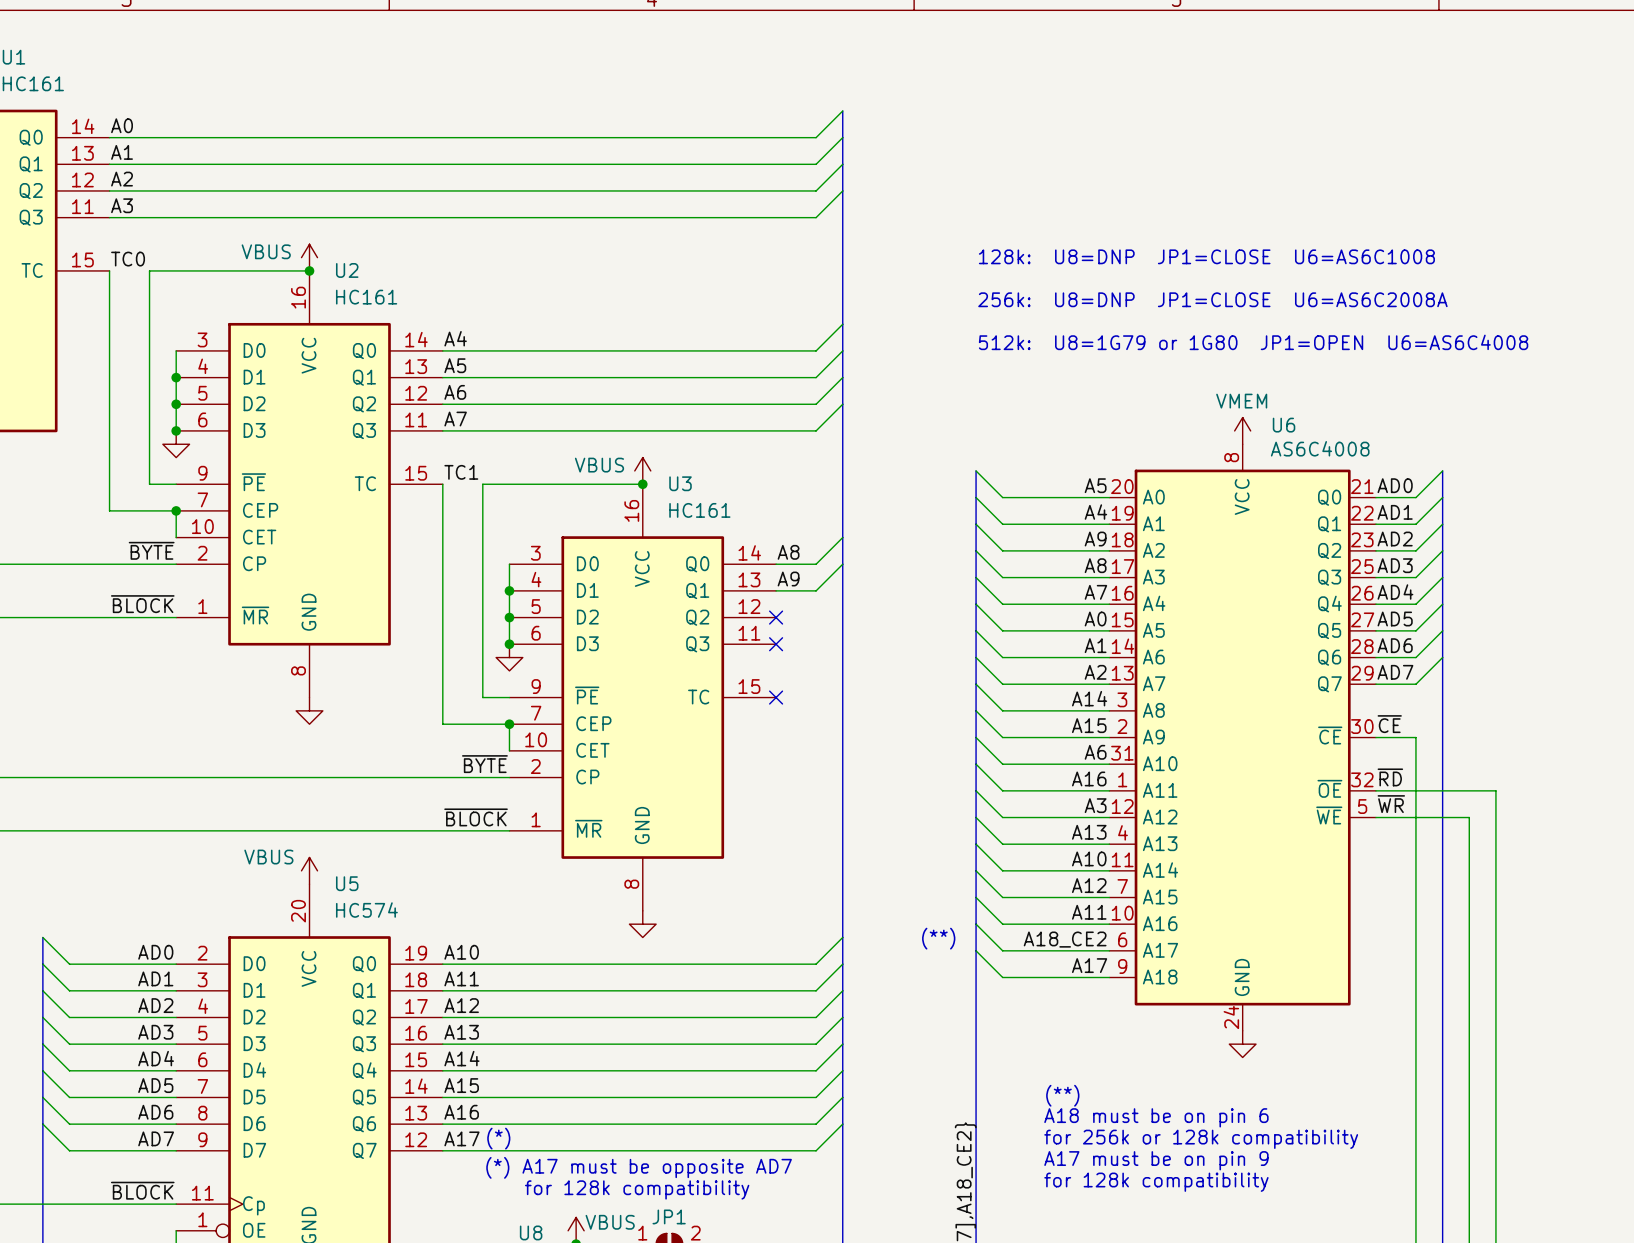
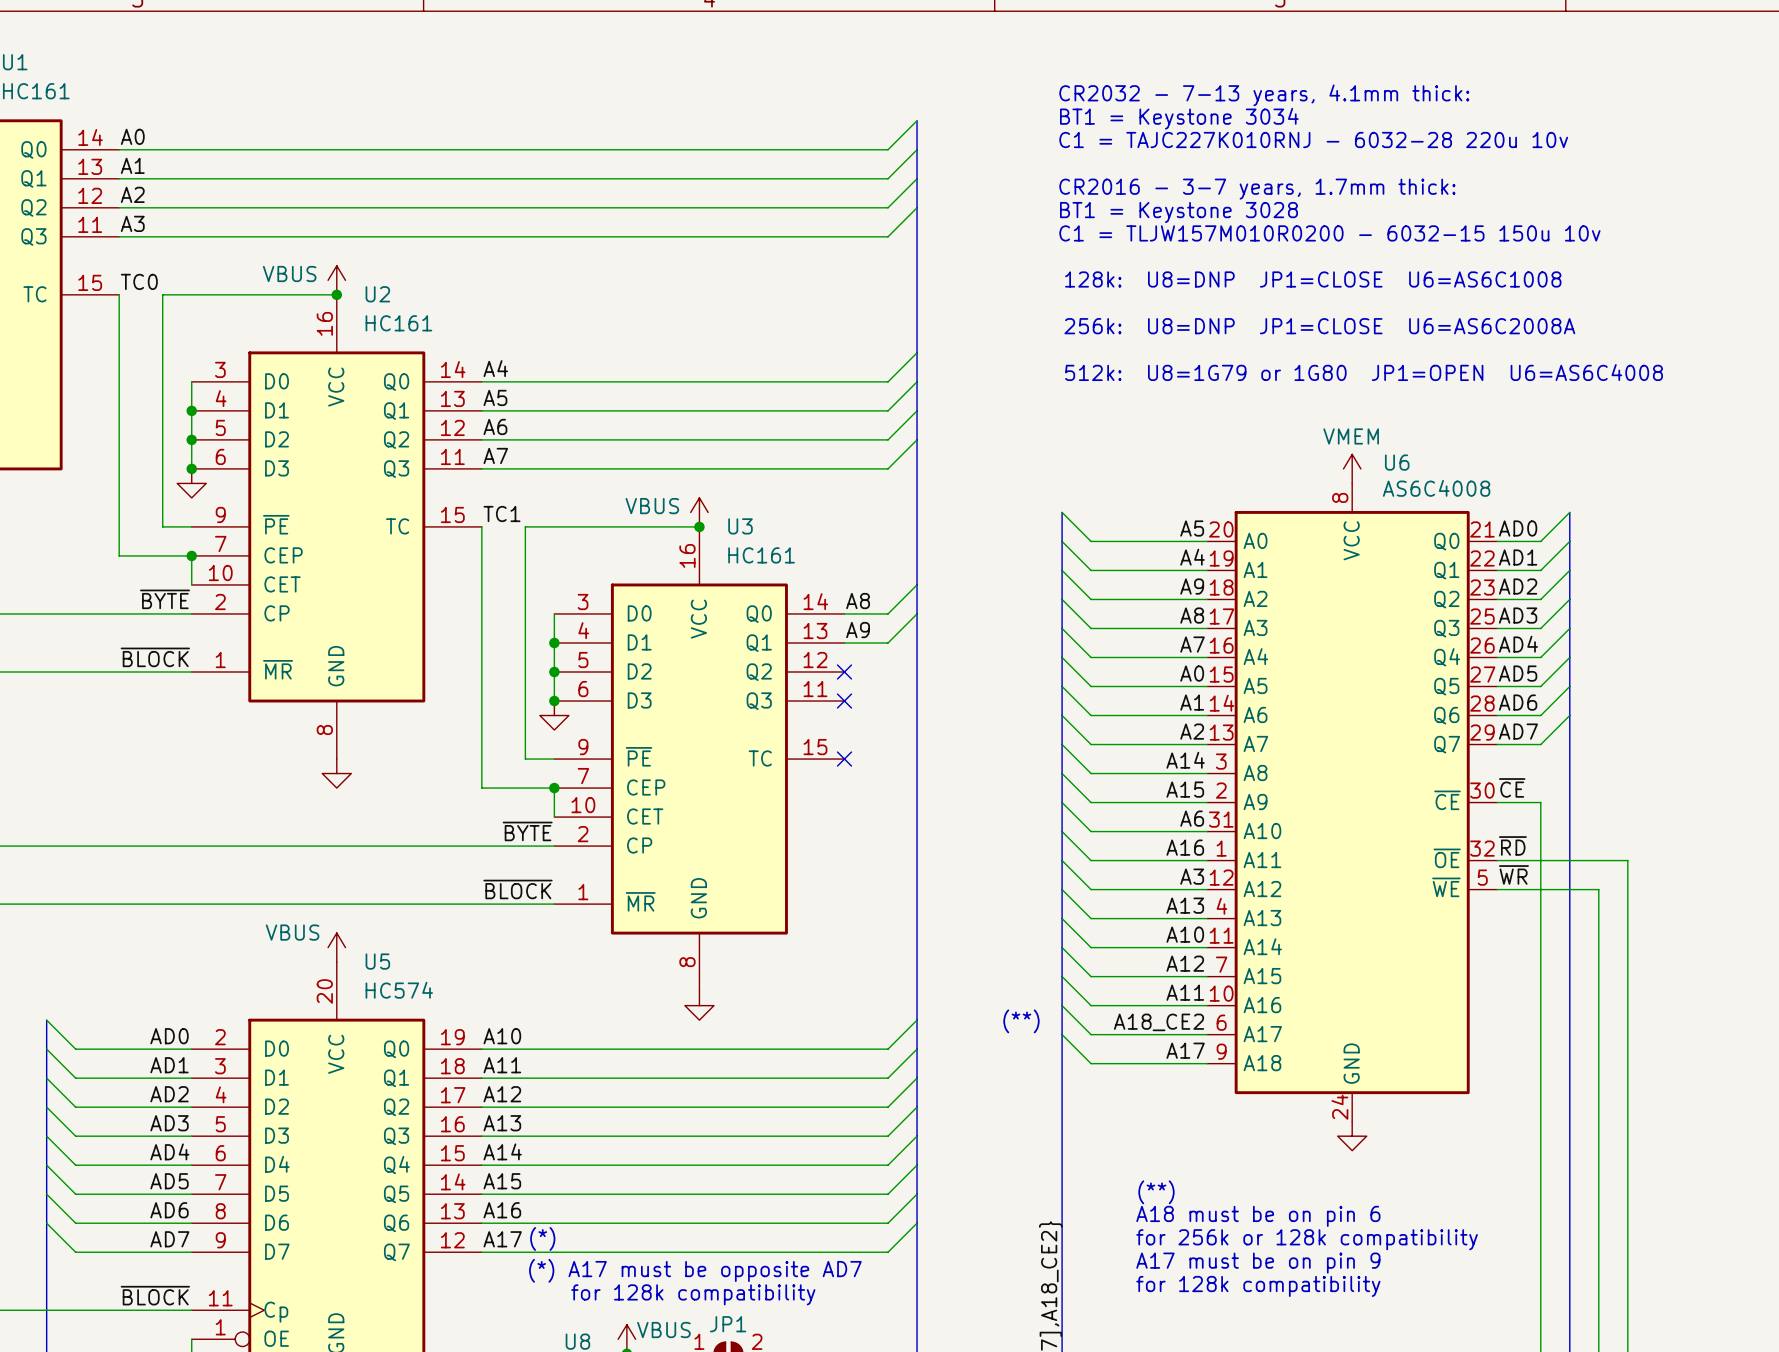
text: none -> CR2032 - 7-13 years, 4.1mm thick: (1264, 95)
text: none -> BT1 = Keystone 3034 (1179, 118)
text: none -> C1 = TAJC227K010RNJ - 6032-28 220u 10v (1313, 140)
text: none -> CR2016 - 3-7 years, 1.7mm thick: (1257, 189)
text: none -> BT1 = Keystone 3028 (1178, 212)
text: none -> C1 = TLJW157M010R0200 - 6032-15 150u 10v (1329, 233)

